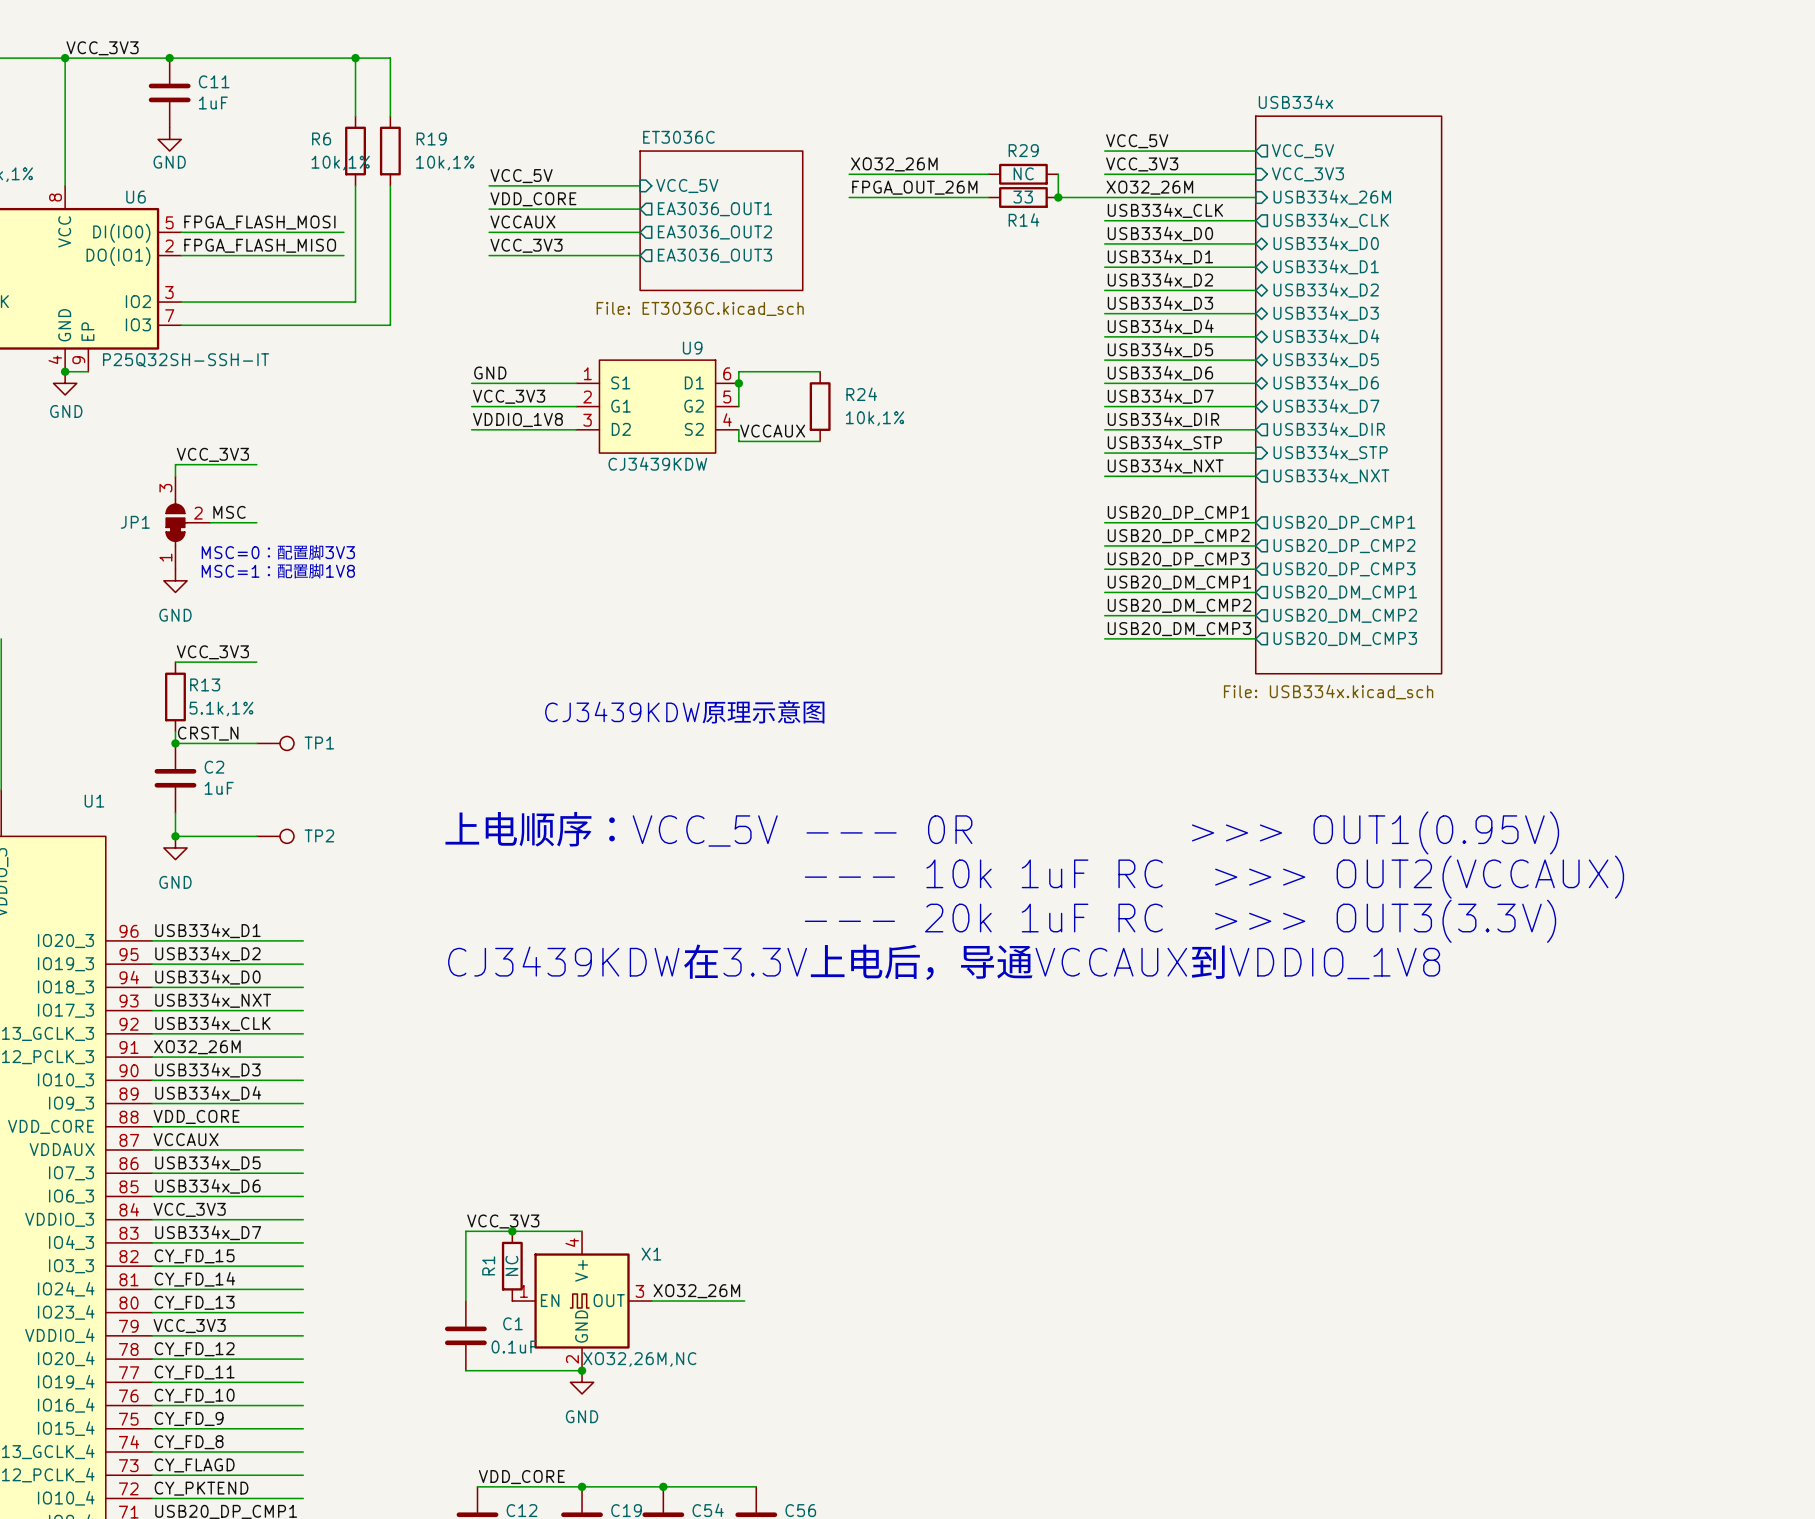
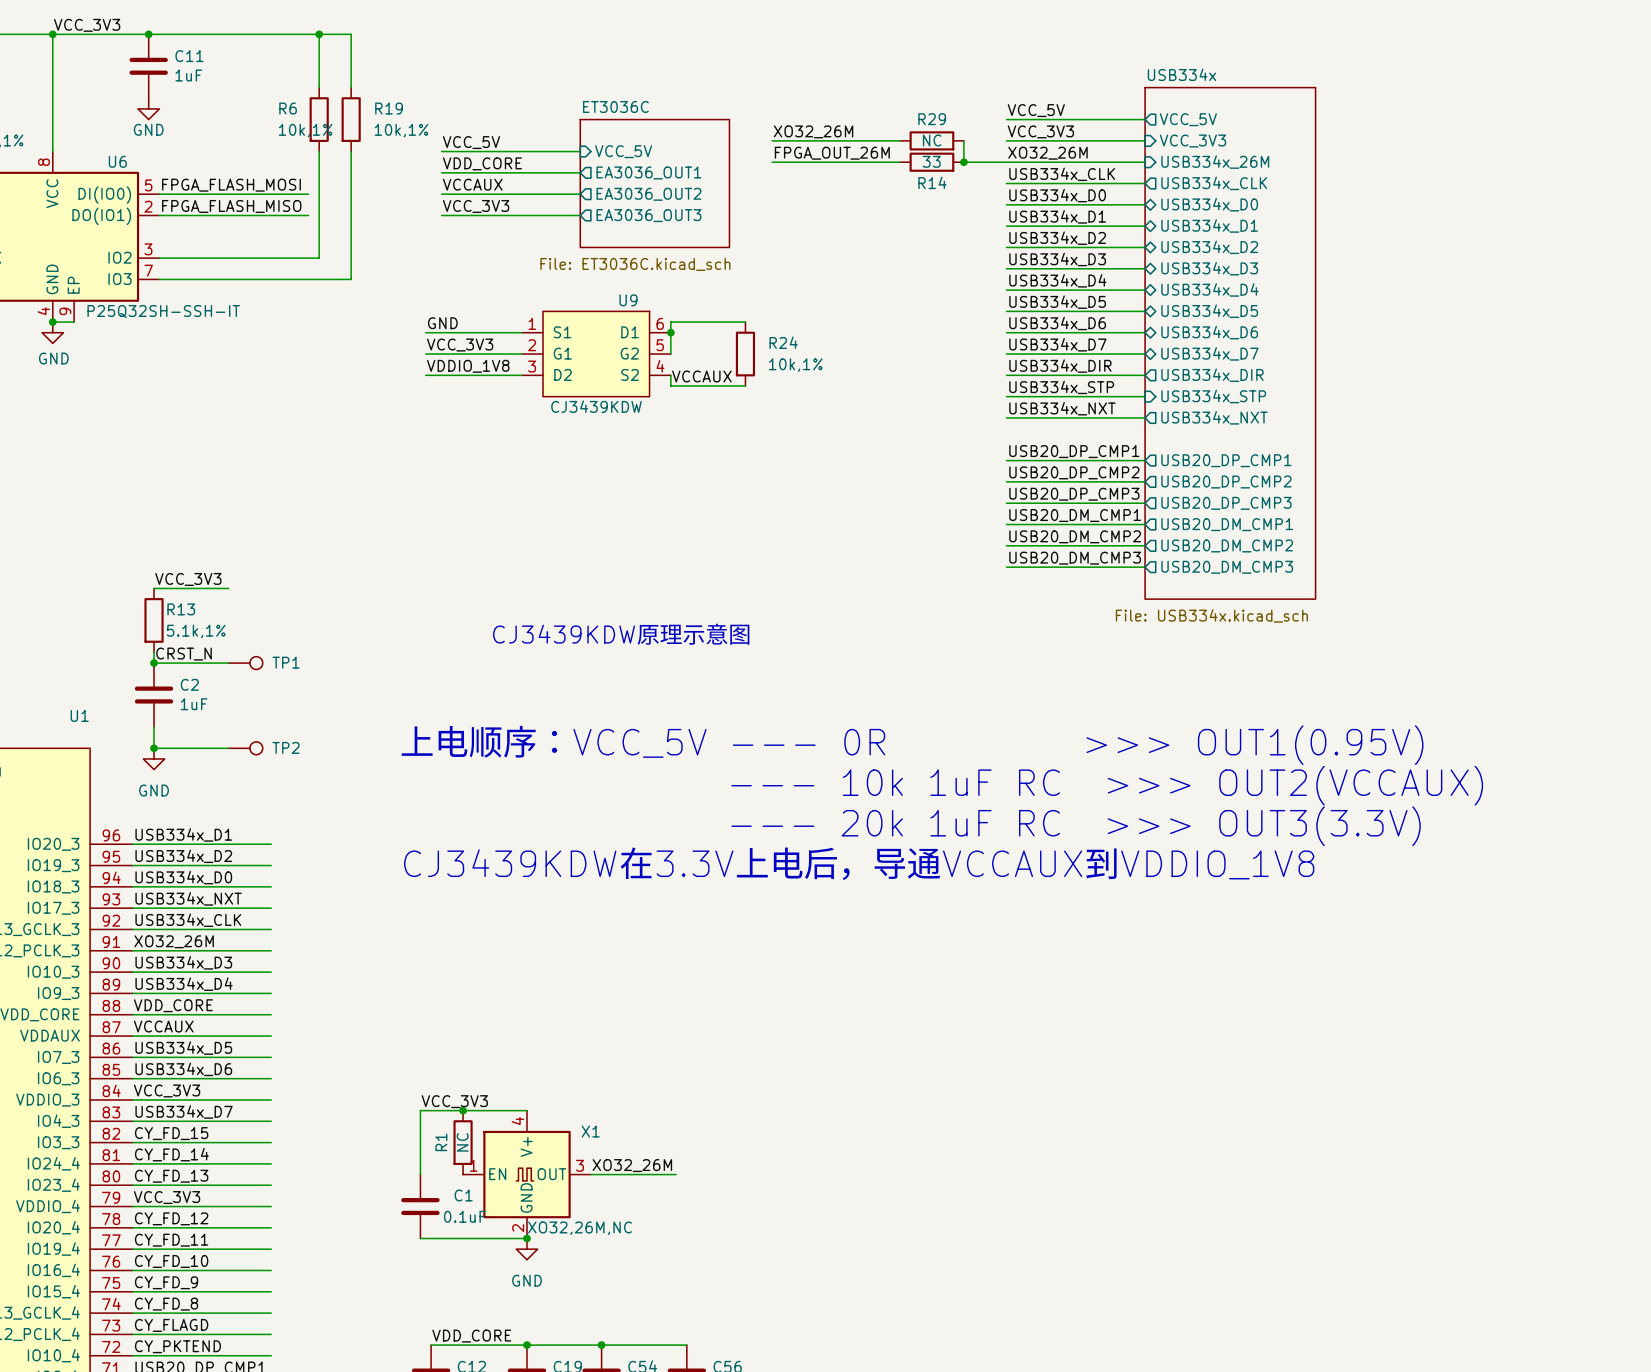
label: VCC_3V3 (212, 454) -> none
wire: (256, 464) (175, 464) (175, 476) -> none
label: MSC (229, 512) -> none
JP1: (188, 522) -> none
wire: (210, 522) (256, 522) -> none
text: MSC=0：配置脚3V3 (278, 552) -> none
text: MSC=1：配置脚1V8 (278, 571) -> none
power symbol: GND (175, 580) -> none

